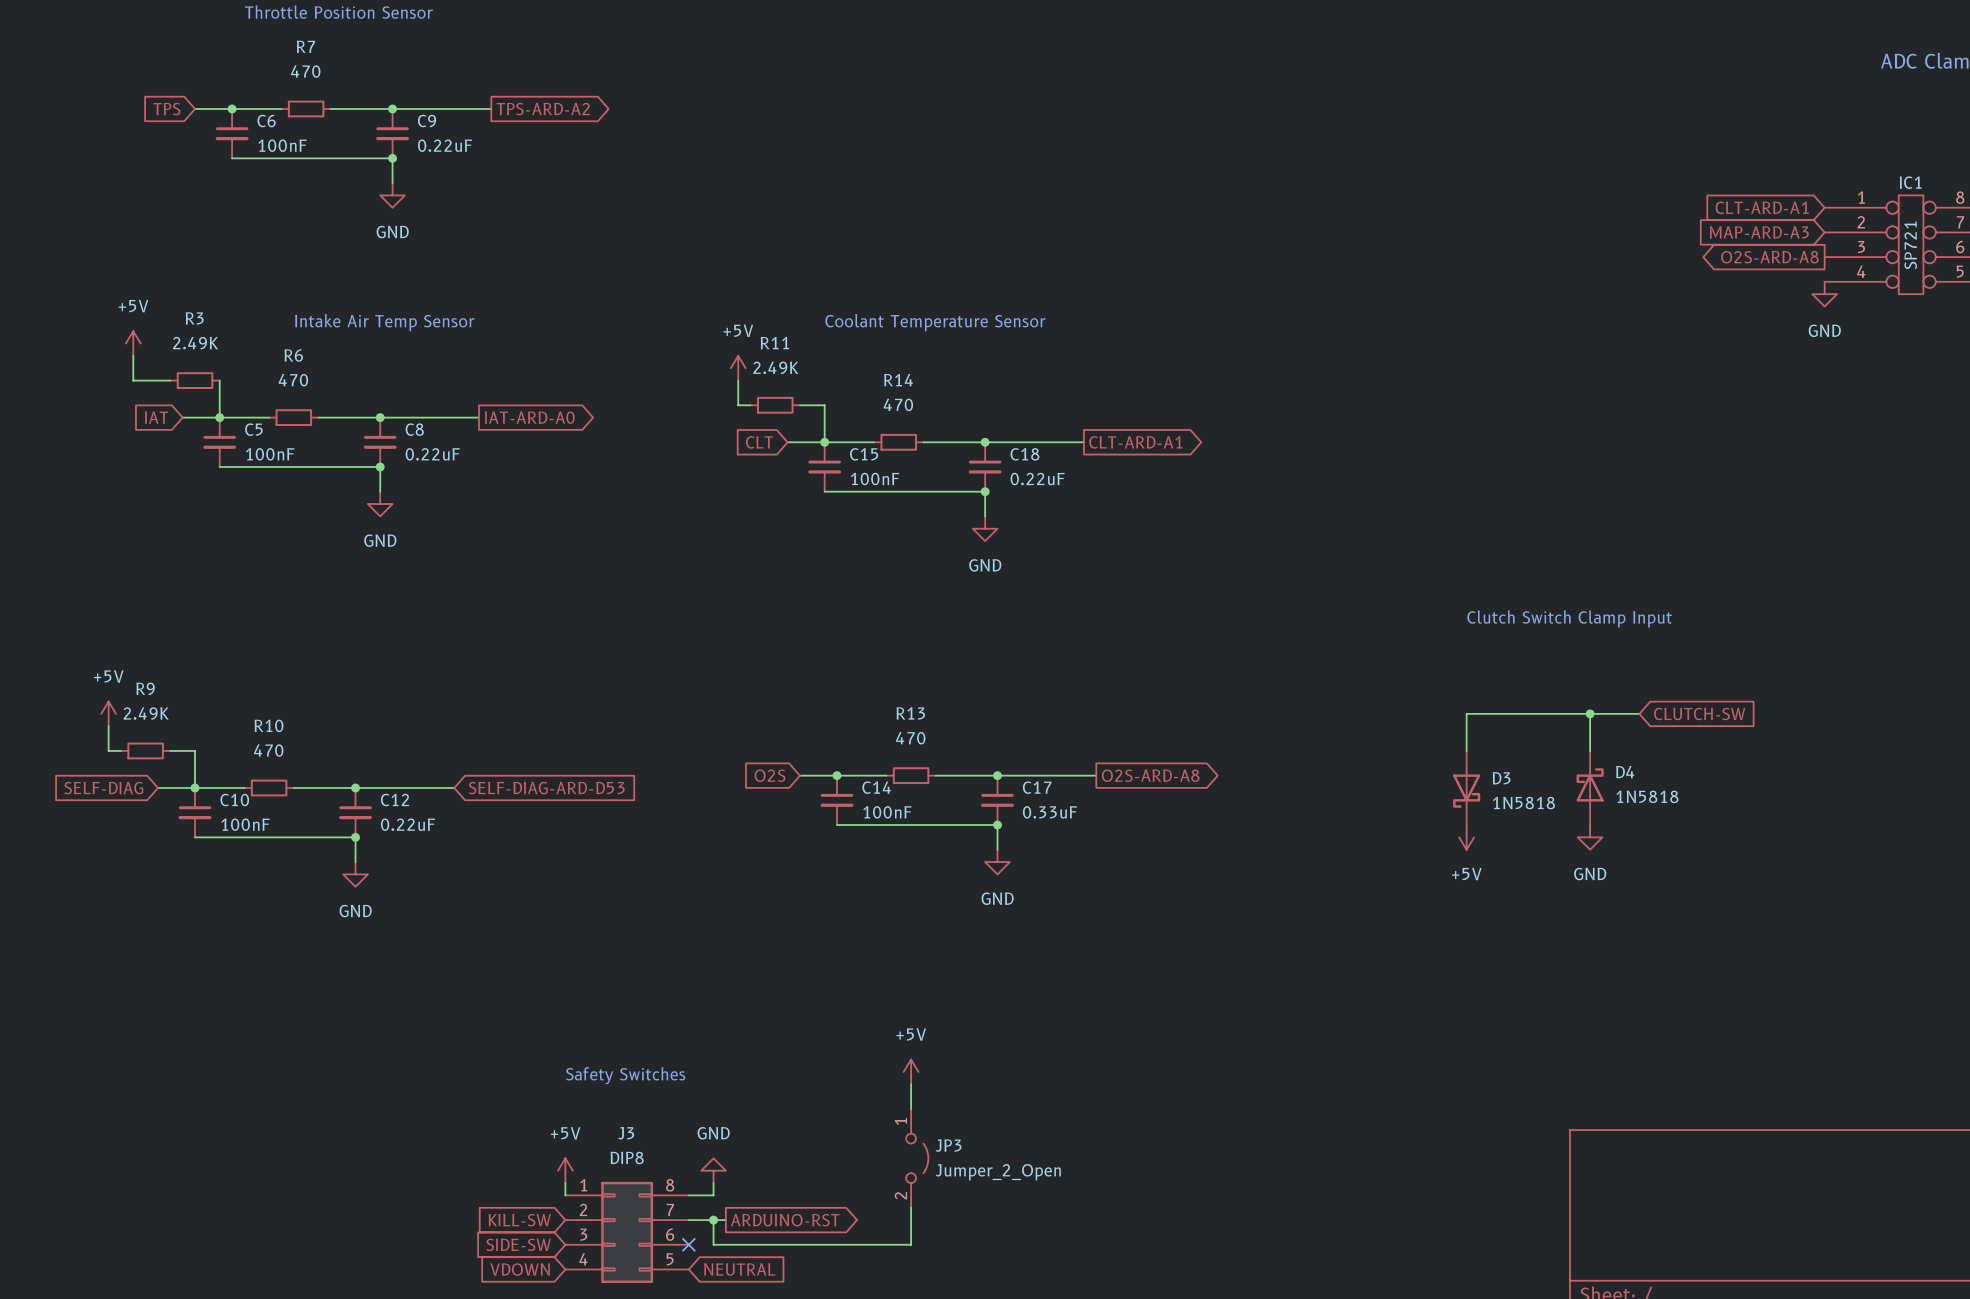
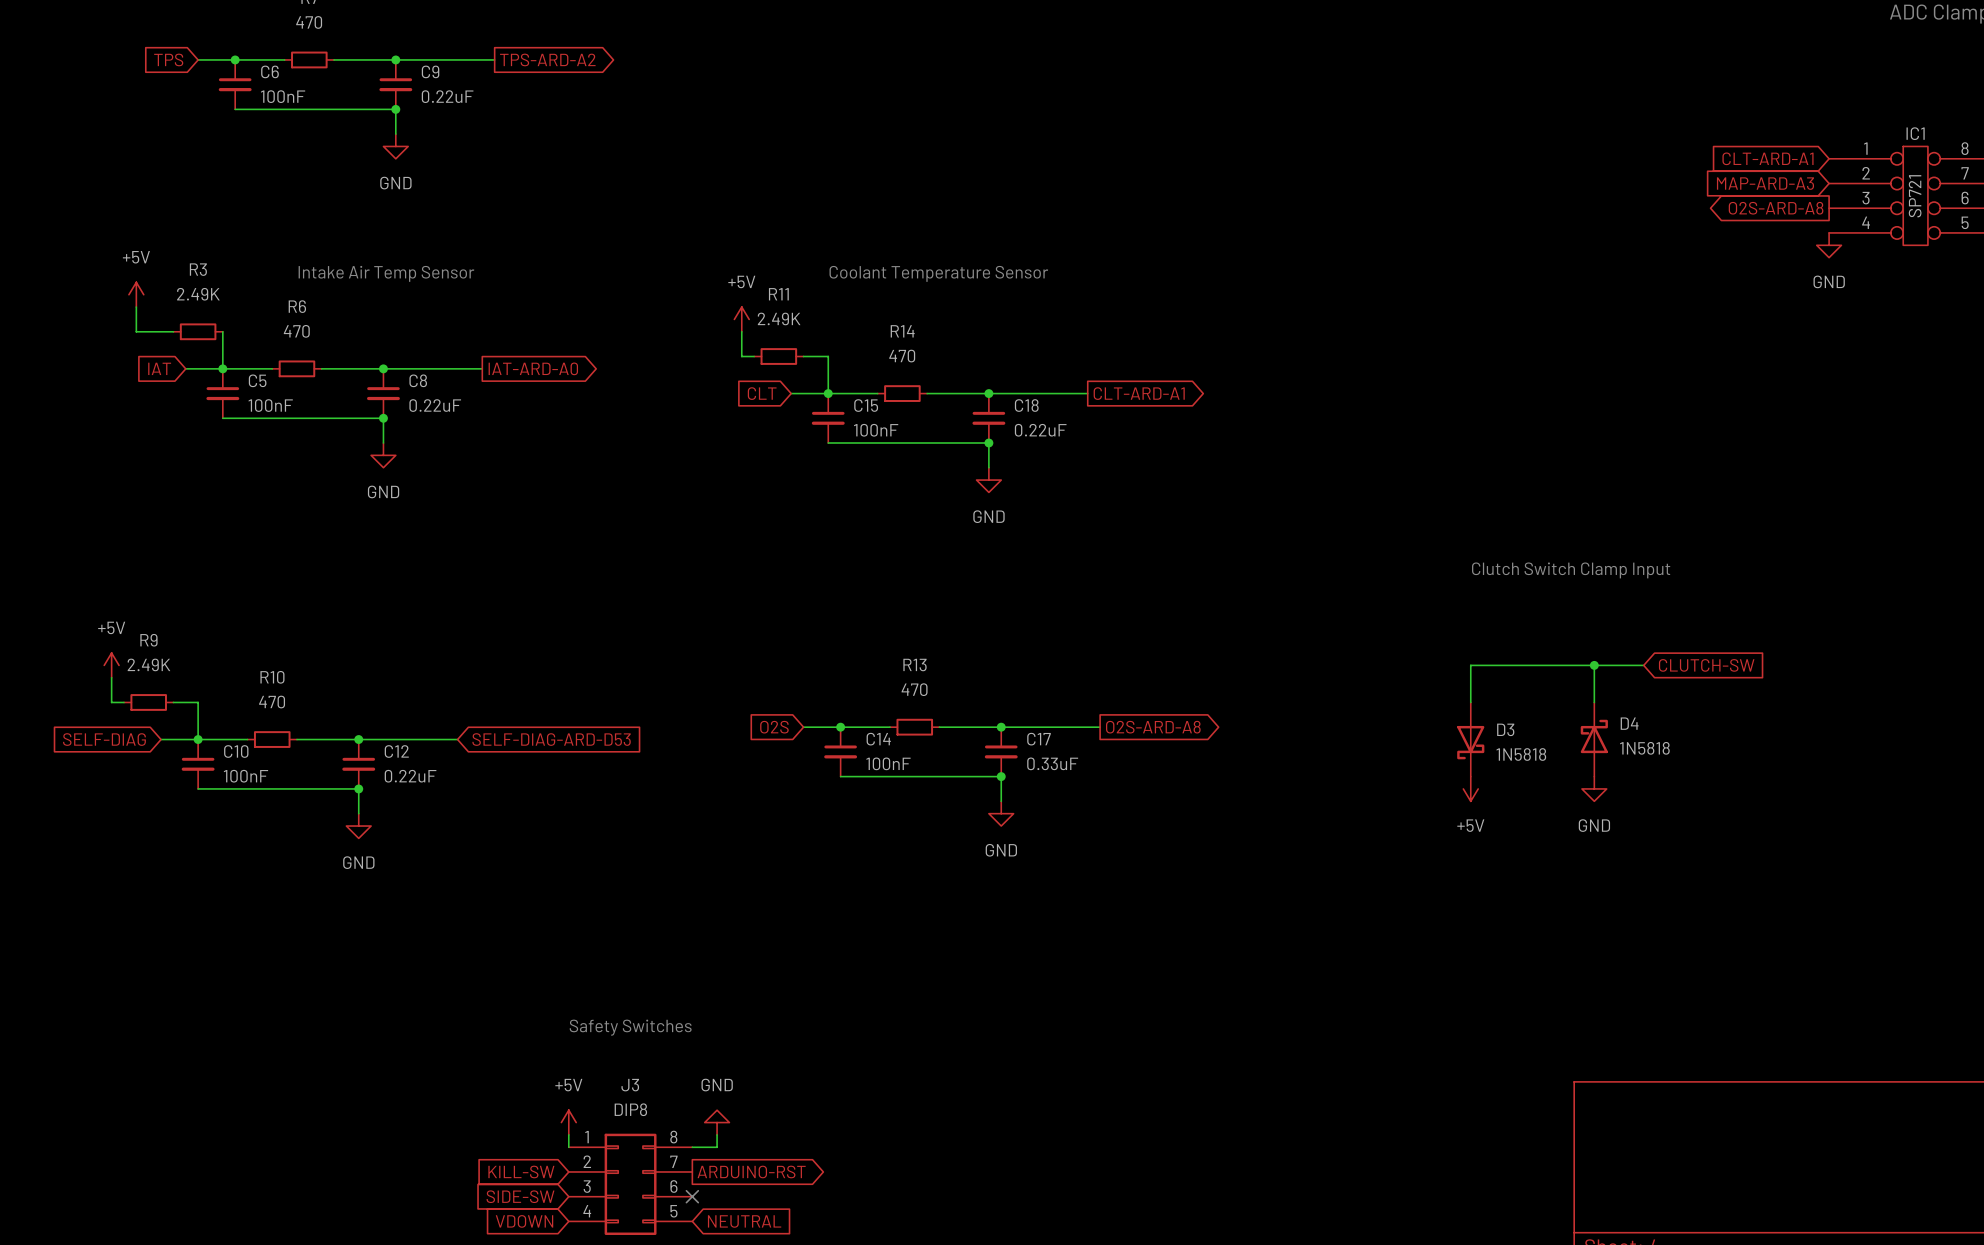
power symbol: +5V (911, 1071) -> none
wire: (911, 1084) (911, 1108) -> none
JP3: Jumper_2_Open (917, 1158) -> none
wire: (911, 1207) (911, 1244) (713, 1244) (713, 1220) -> none
wire: (688, 1220) (725, 1220) -> none
junction: (713, 1220) -> none
global label position: ARDUINO-RST (785, 1220) -> ARDUINO-RST (751, 1171)

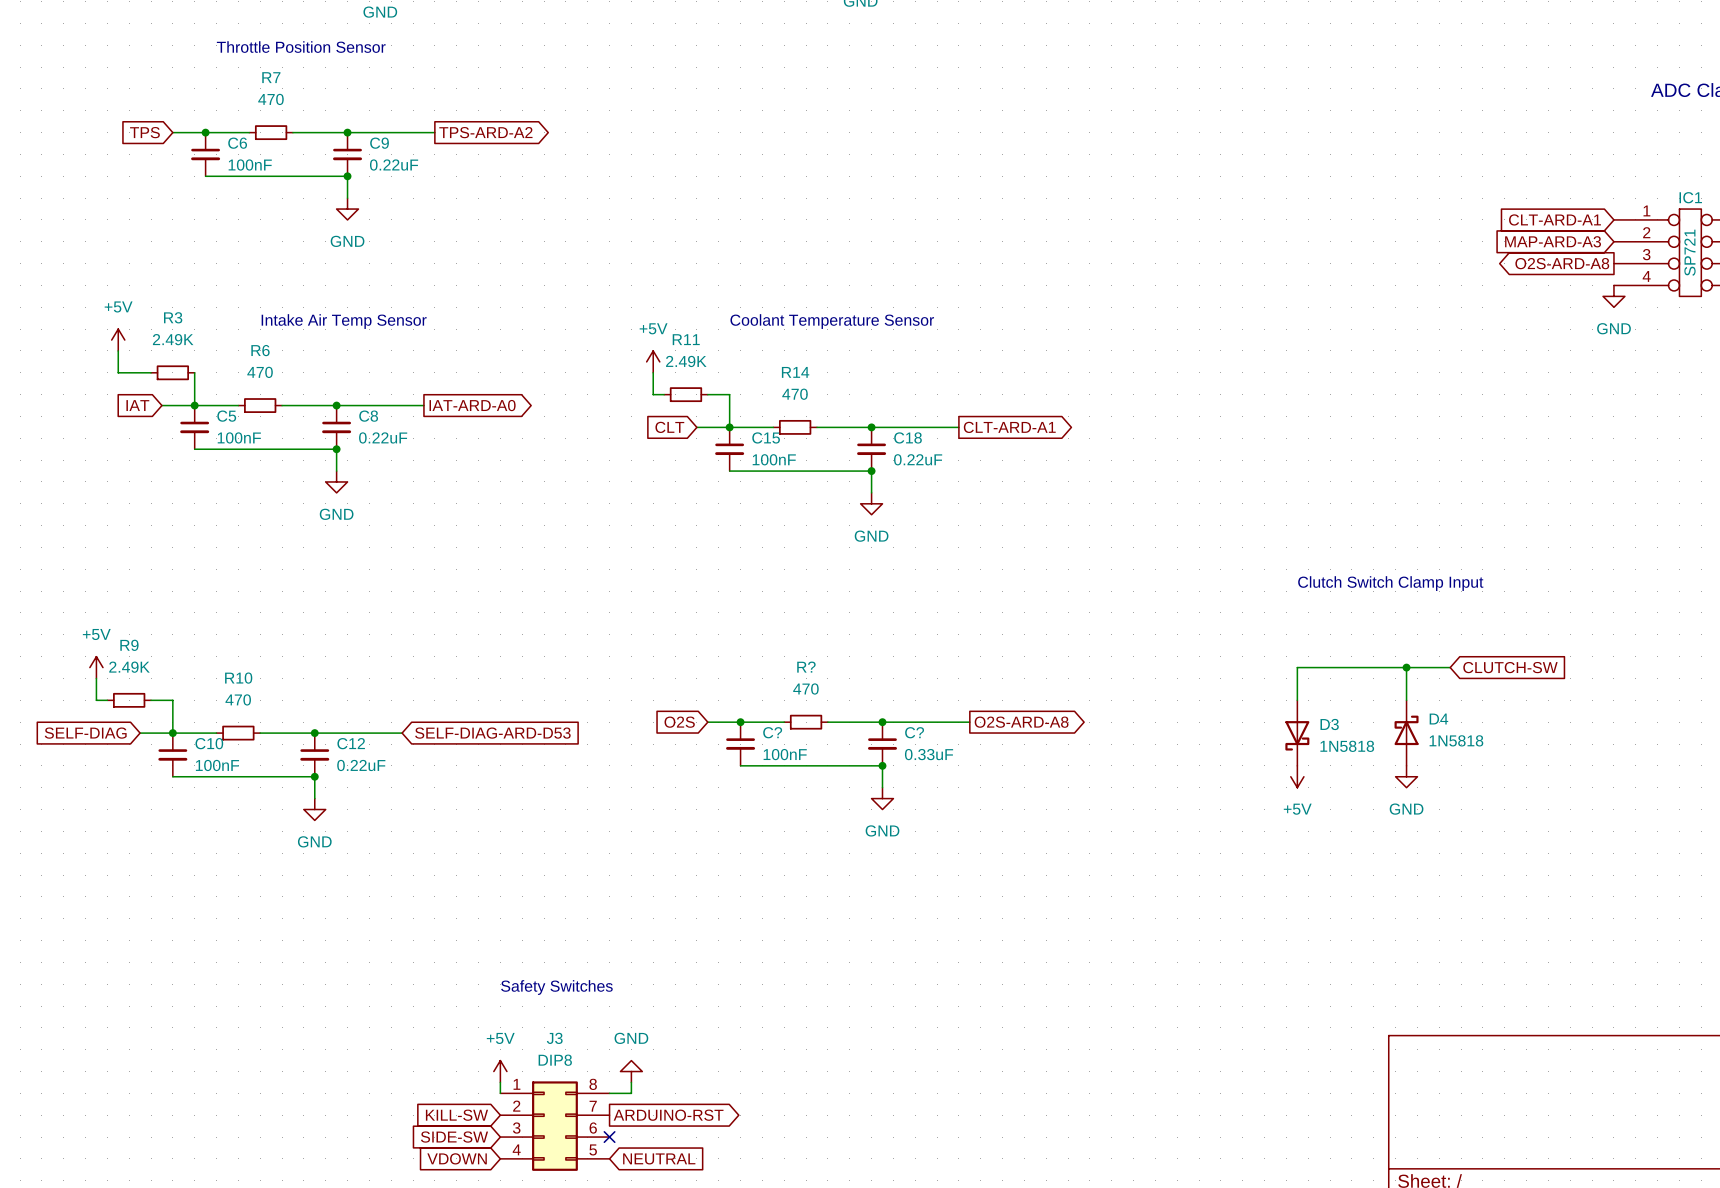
R13 name: R13 (915, 665) -> R? (806, 667)
C14 name: C14 (878, 739) -> C? (772, 732)
C17 name: C17 (1039, 739) -> C? (914, 732)

